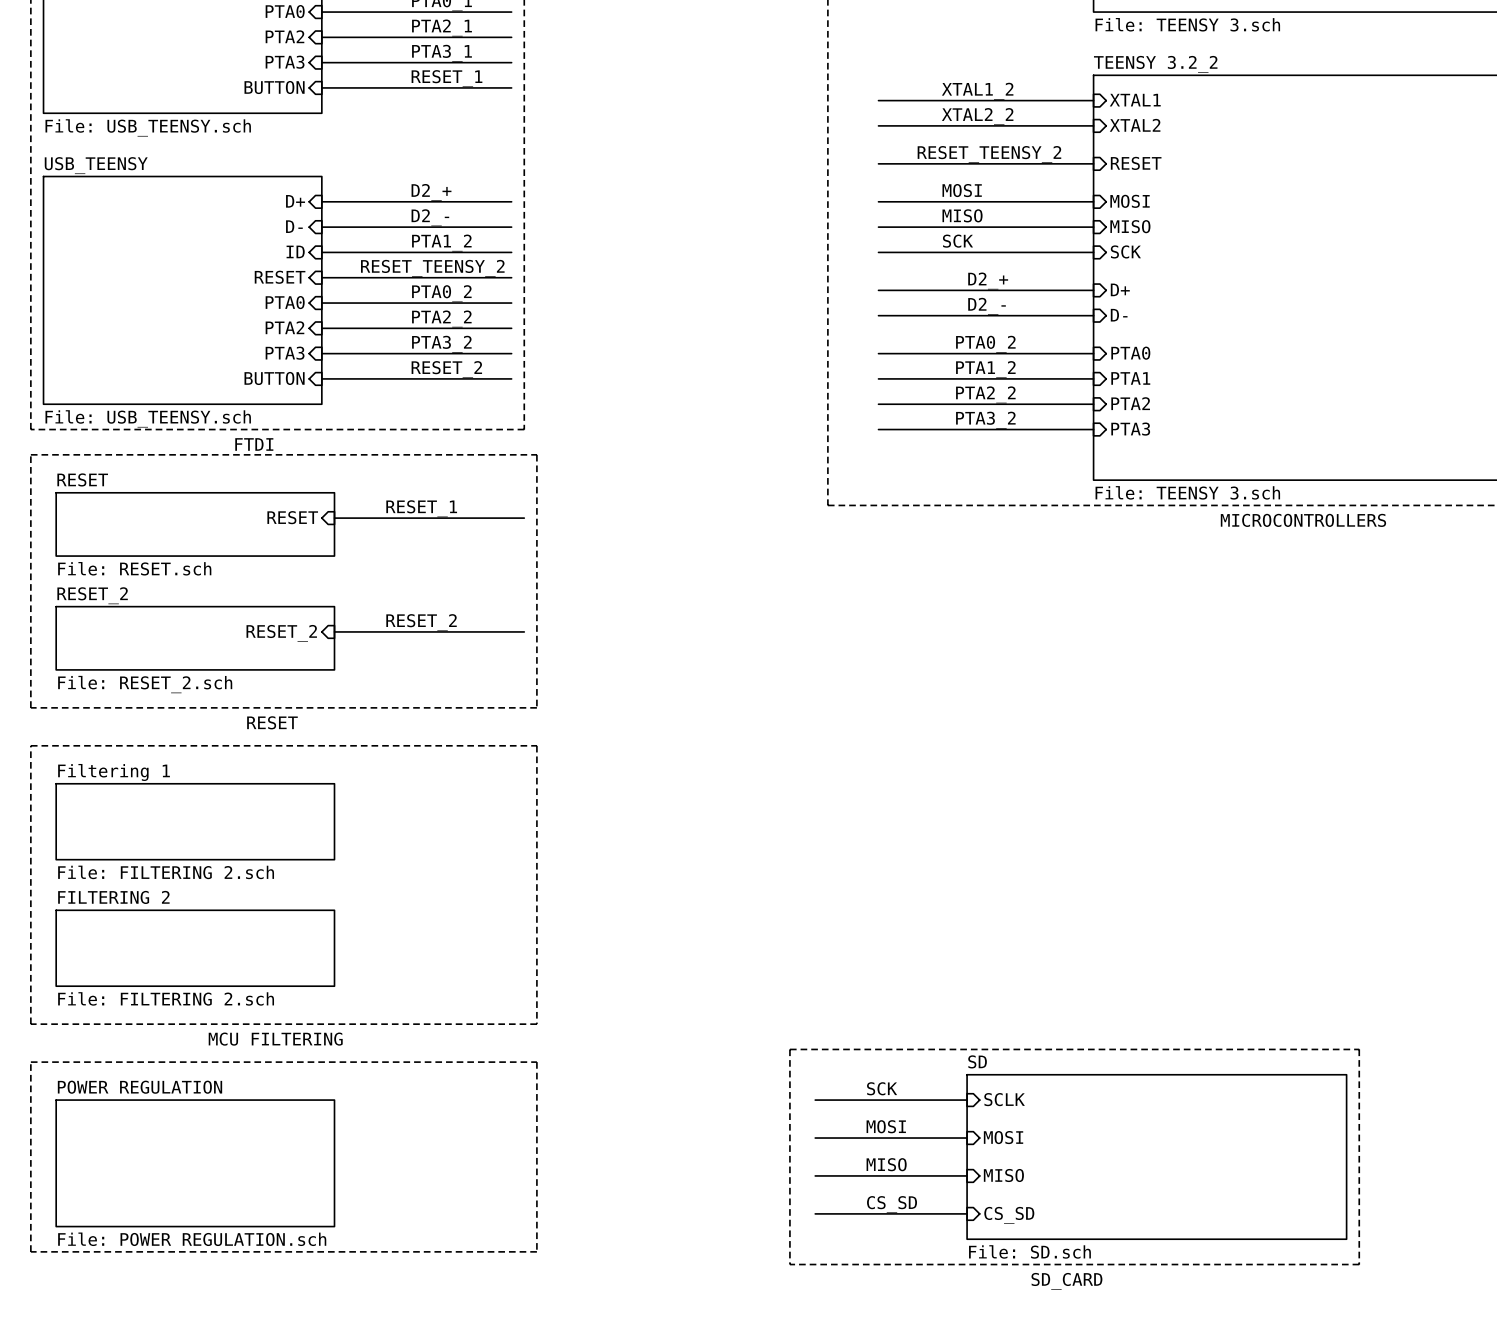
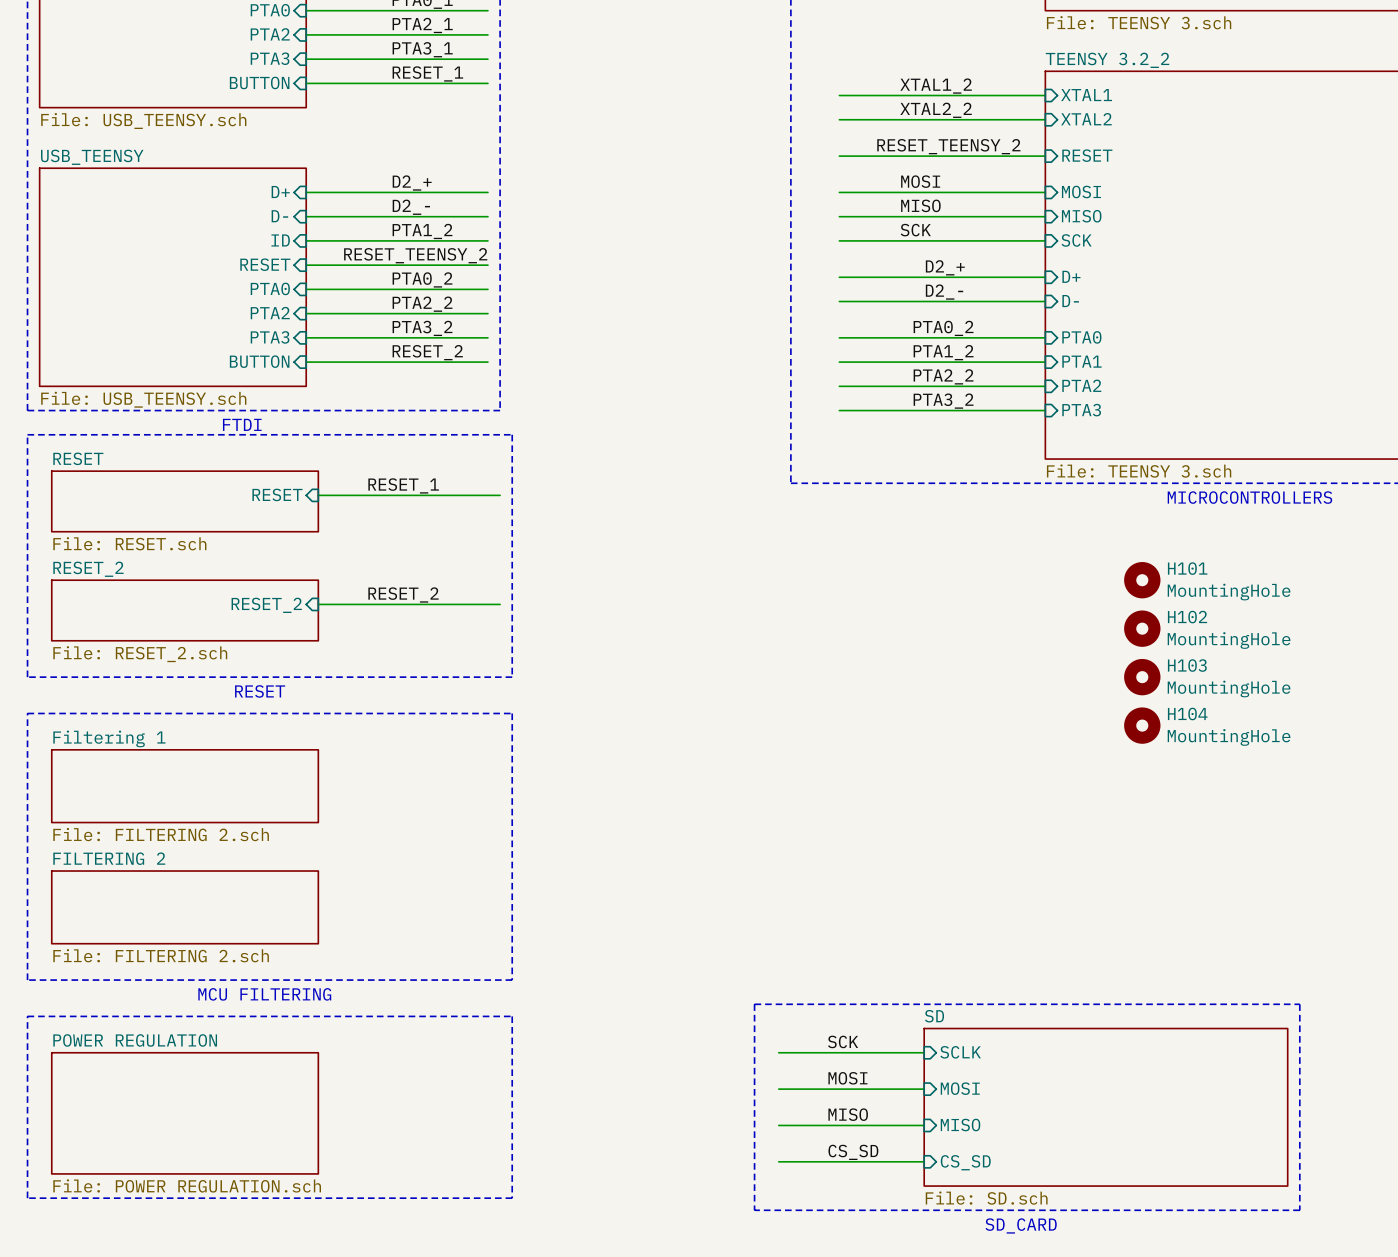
H101: none -> MountingHole (1142, 580)
H102: none -> MountingHole (1142, 628)
H103: none -> MountingHole (1142, 677)
H104: none -> MountingHole (1142, 725)

